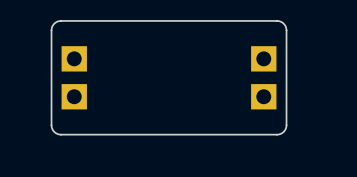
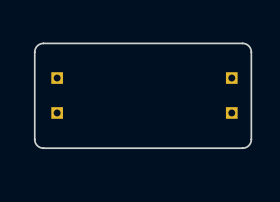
part footprint: [61, 46, 87, 72] -> [51, 72, 63, 84]
part footprint: [251, 46, 277, 72] -> [225, 72, 238, 84]
part footprint: [61, 84, 87, 110] -> [51, 107, 63, 119]
part footprint: [251, 84, 277, 110] -> [225, 107, 238, 119]

